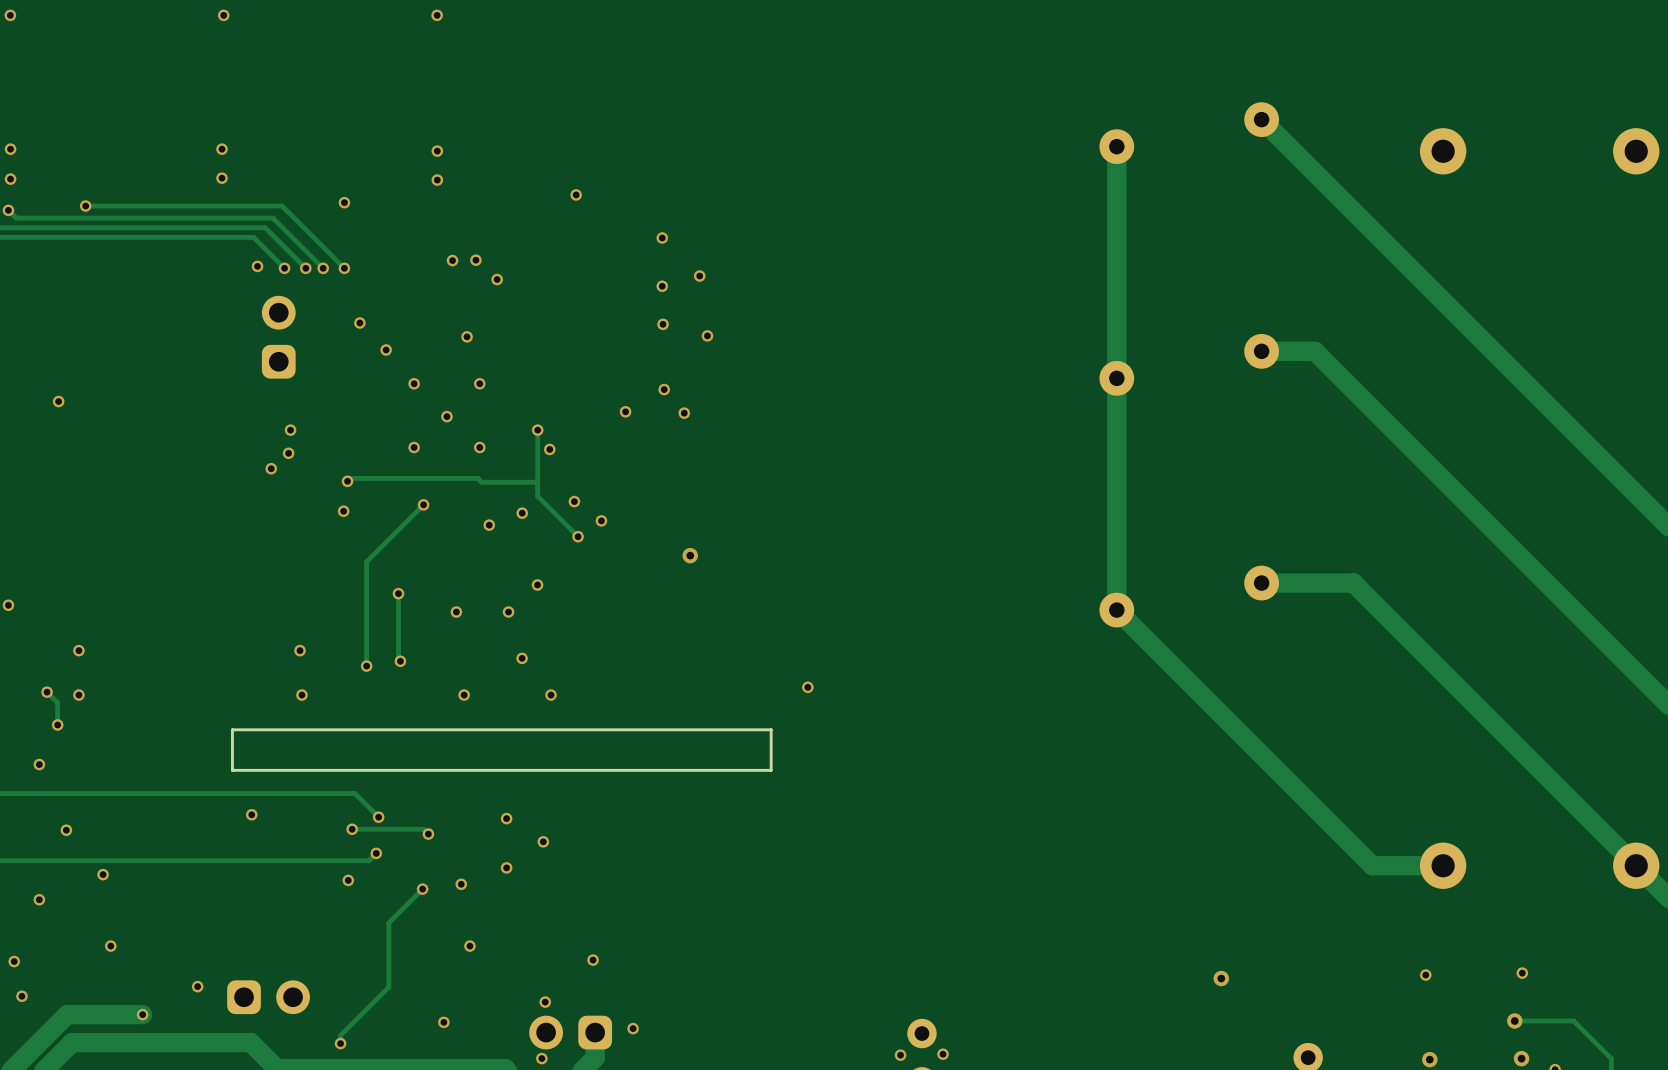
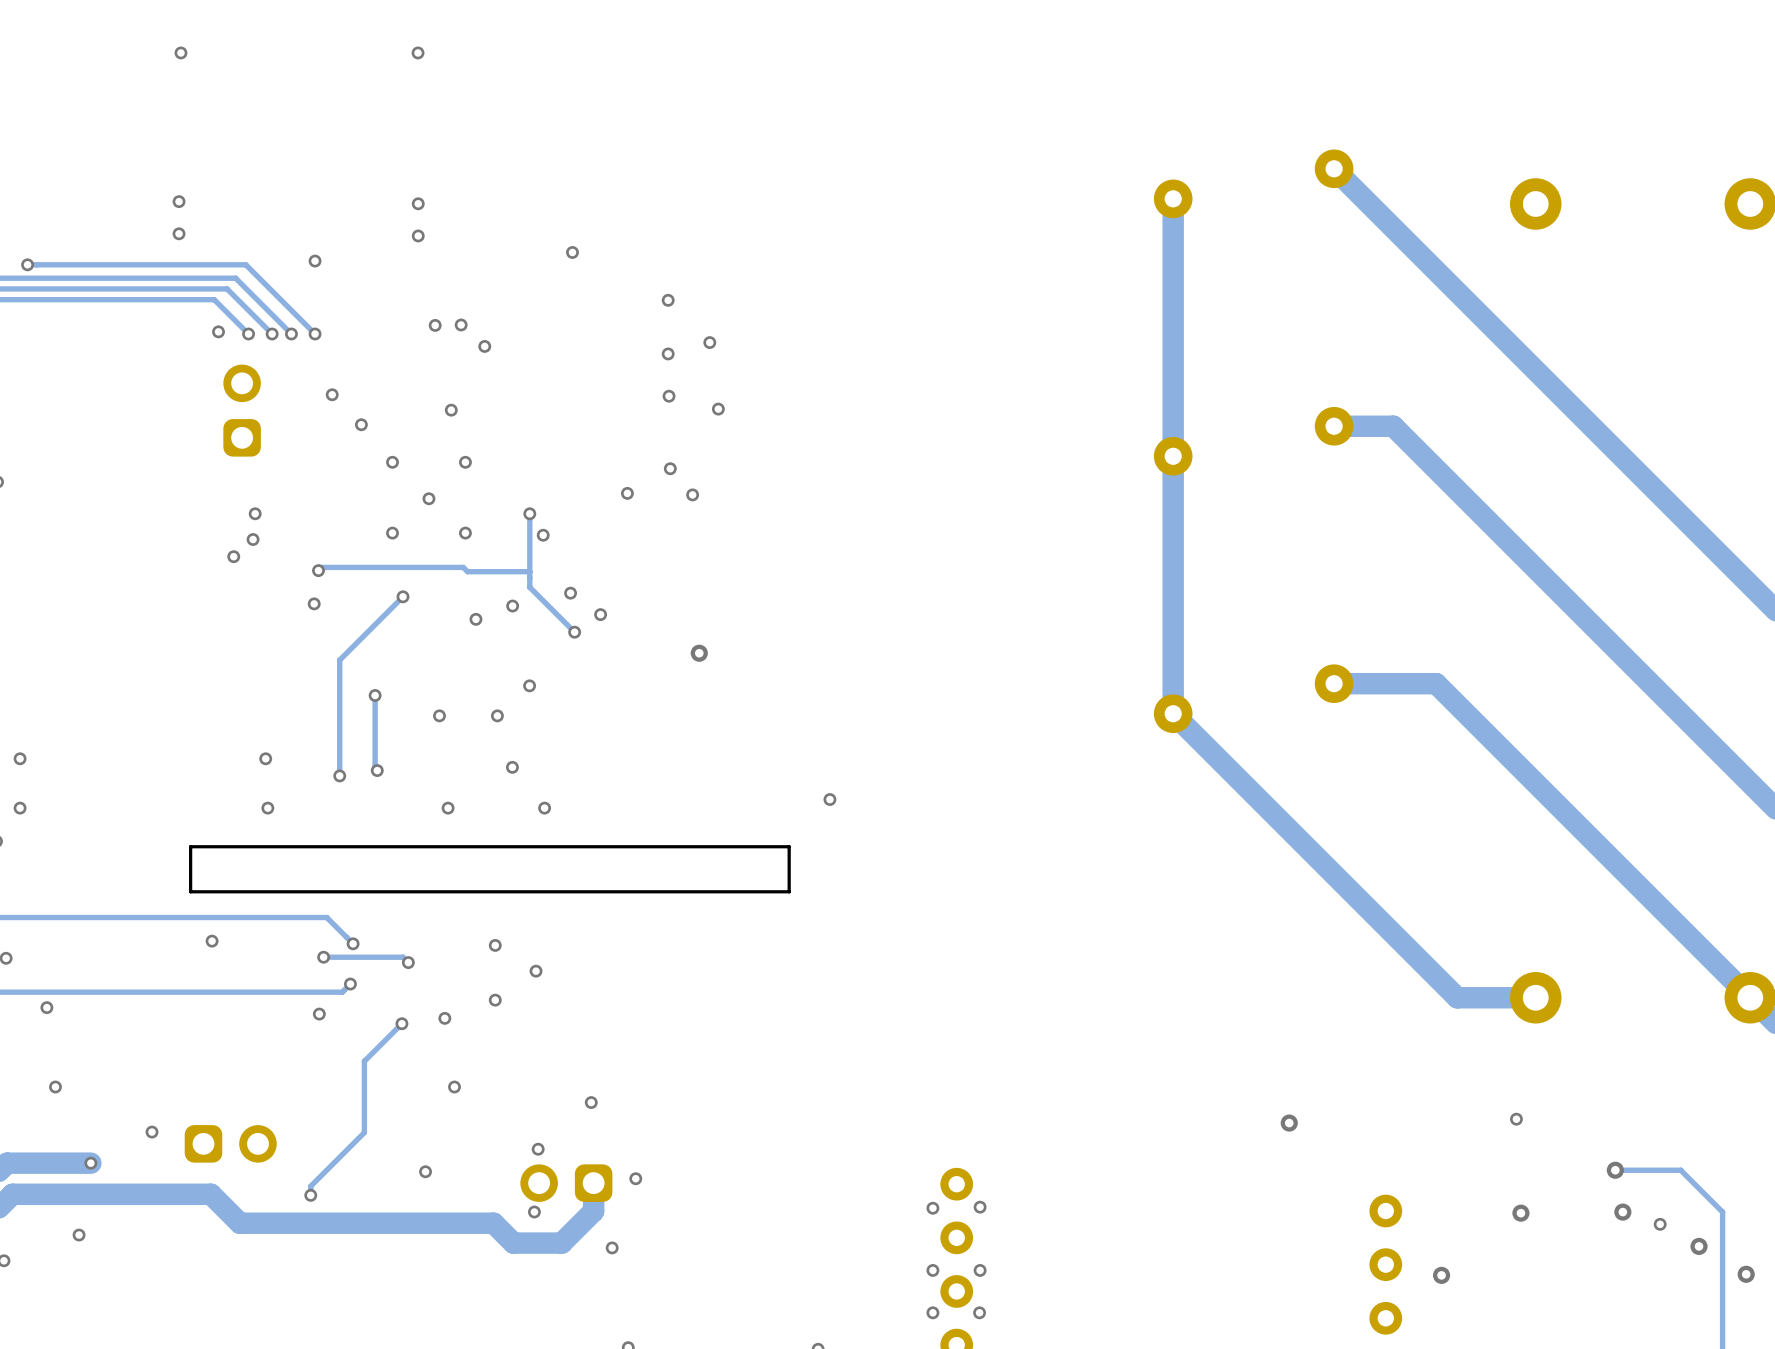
via: (1522, 973) -> none

